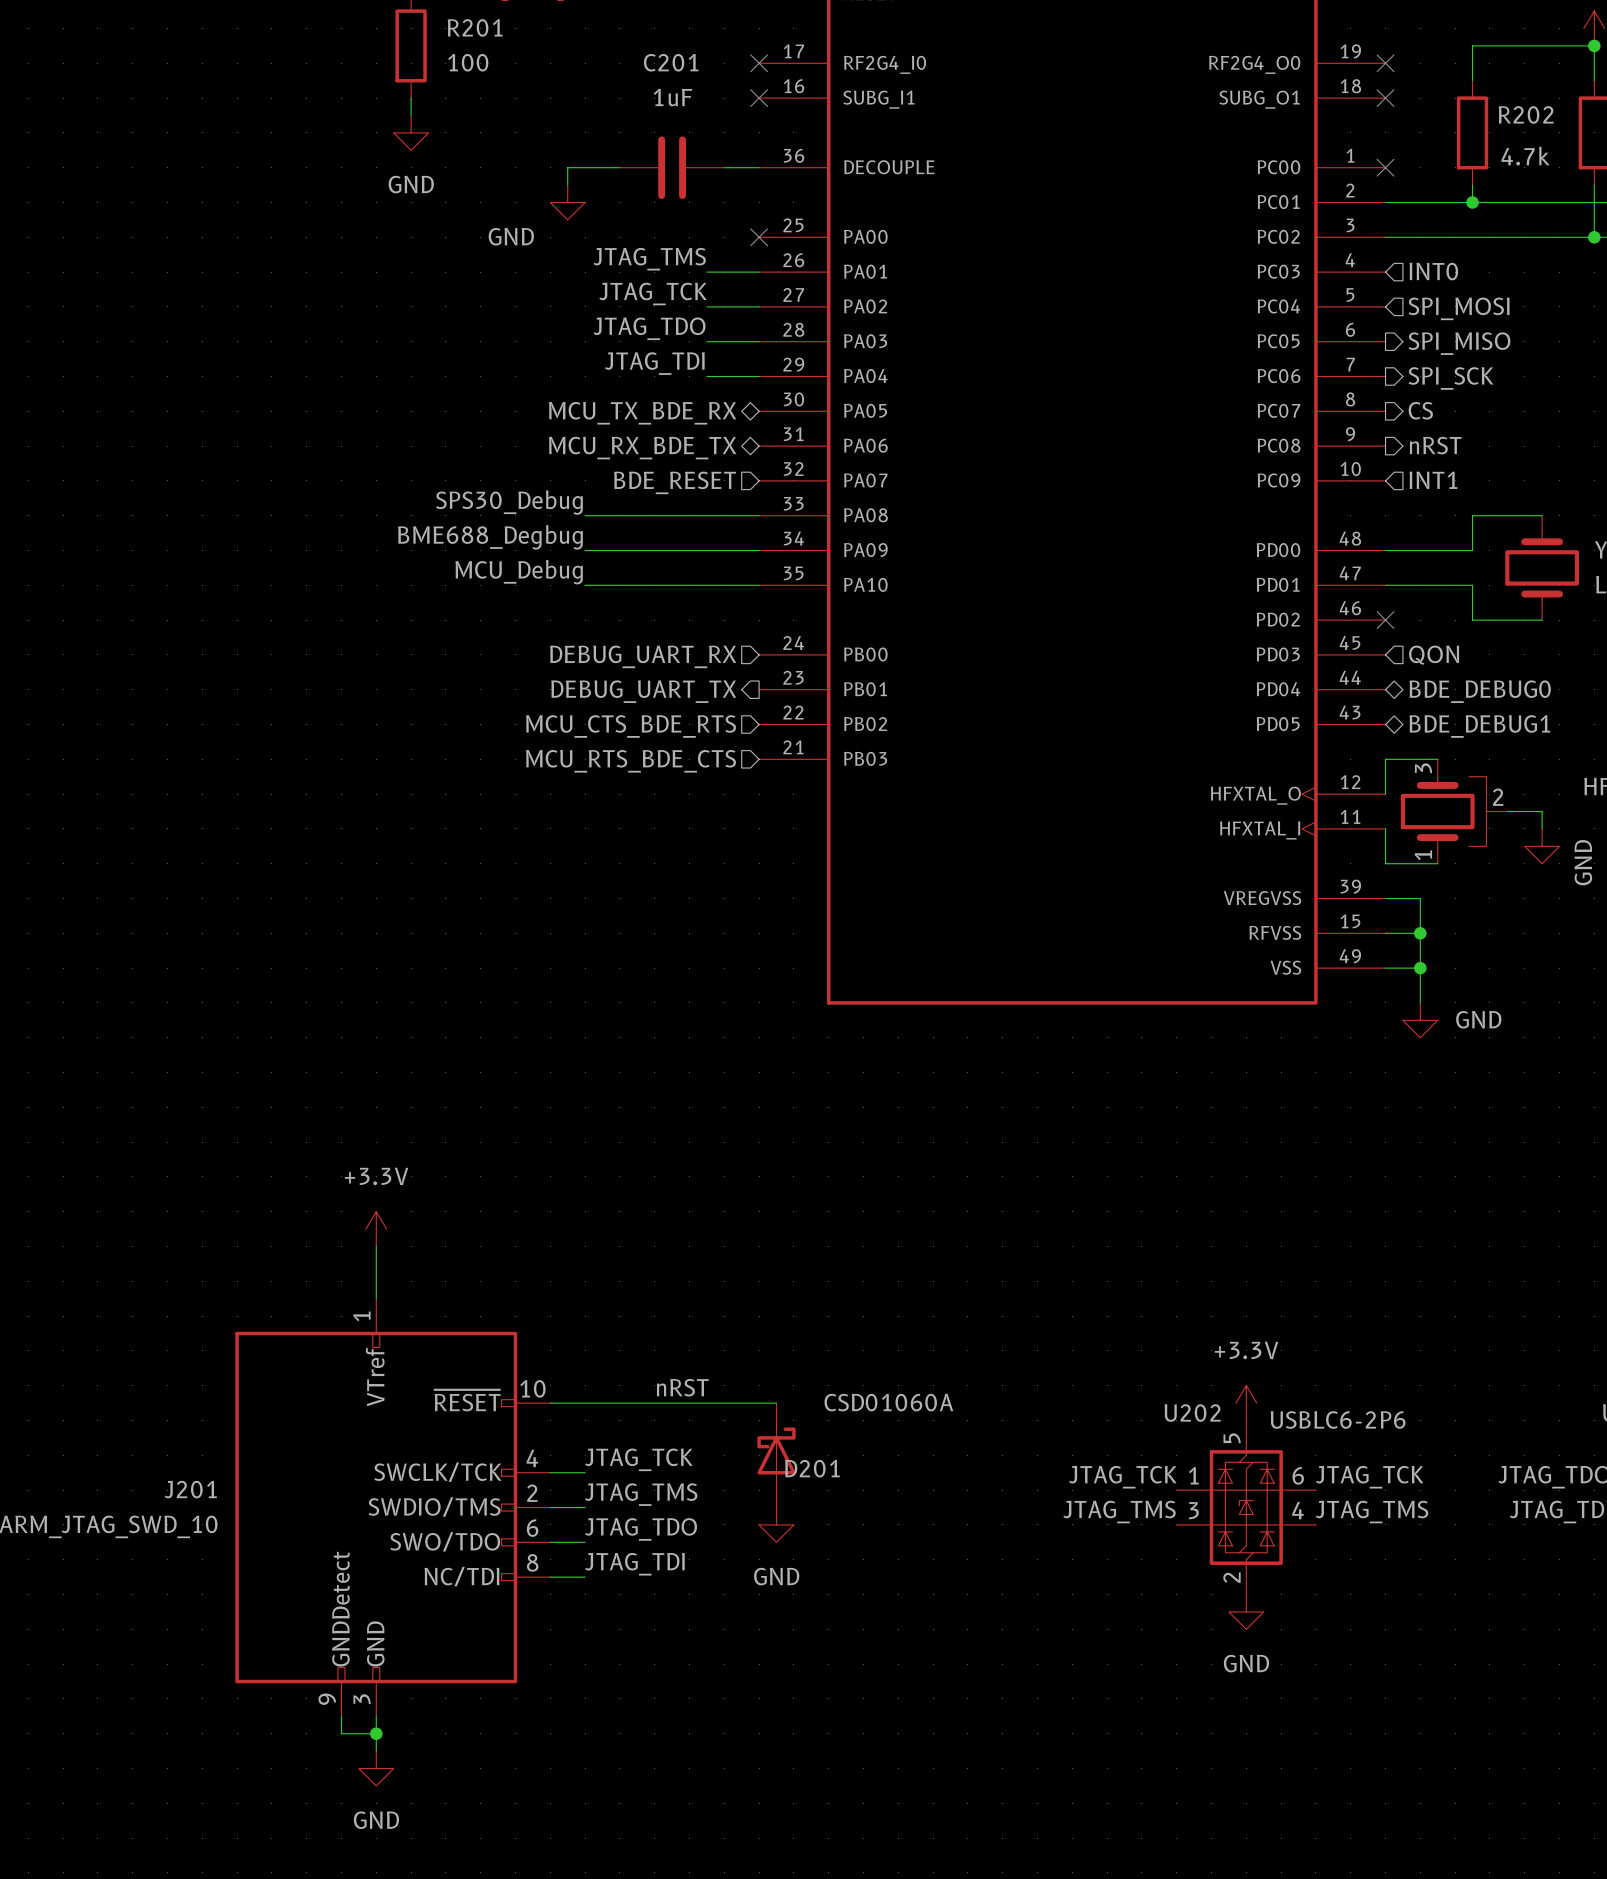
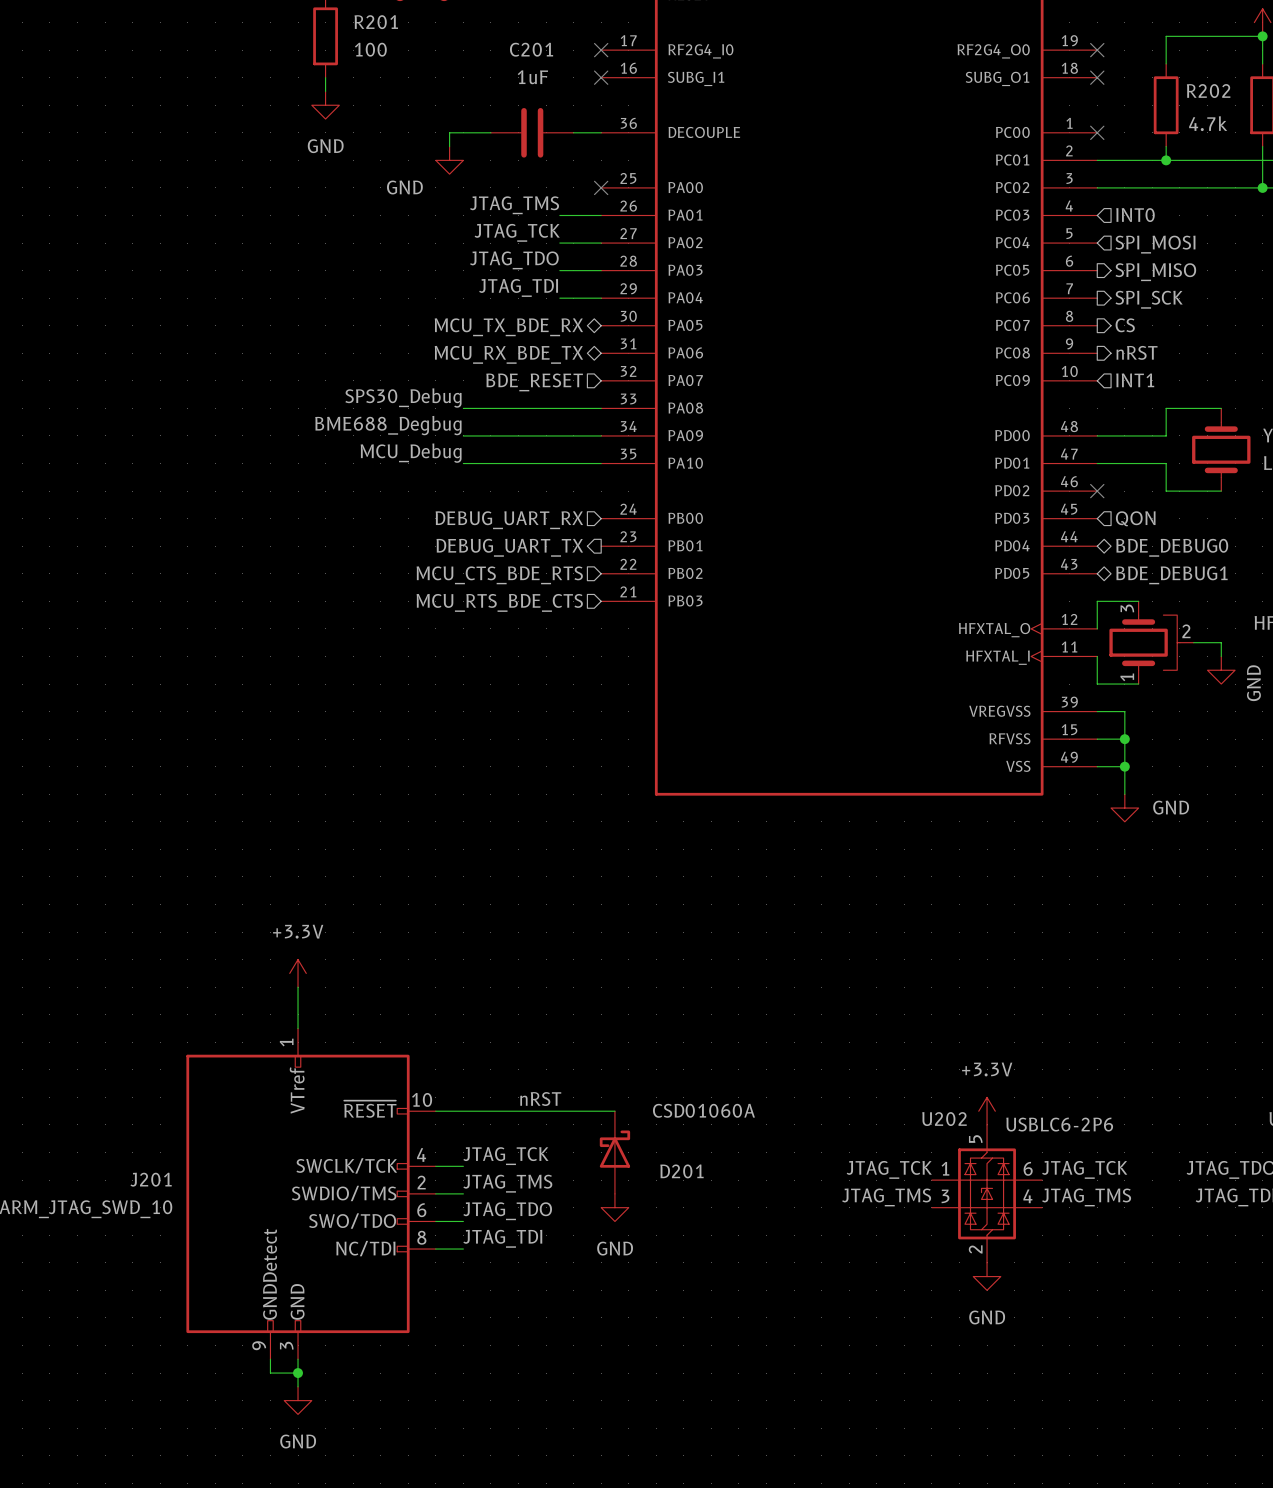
D201 name position: D201 (812, 1468) -> D201 (681, 1171)

